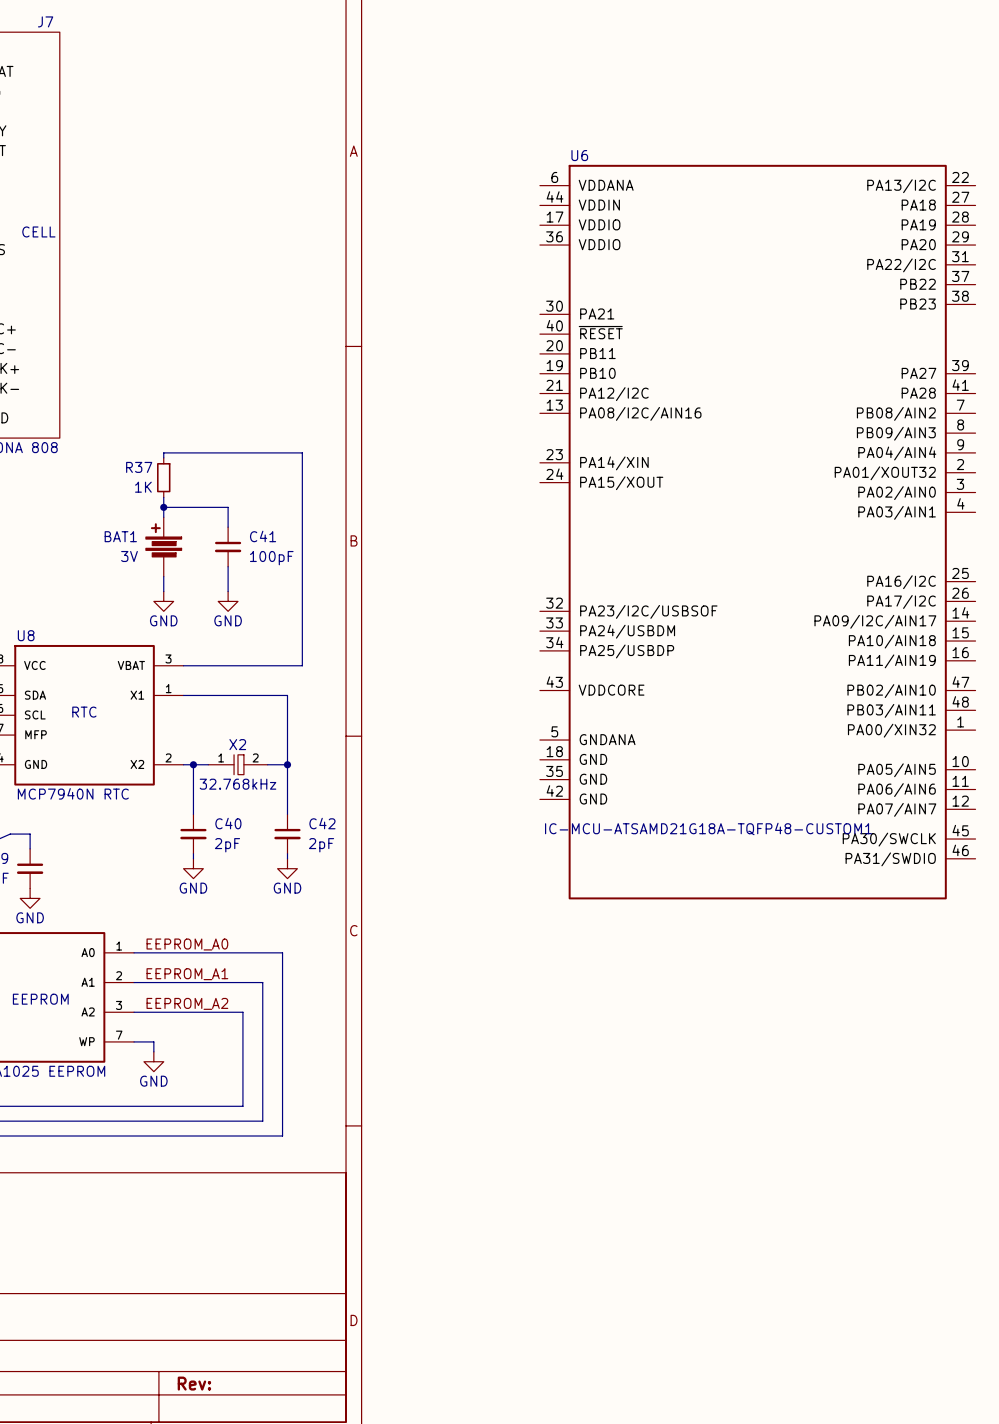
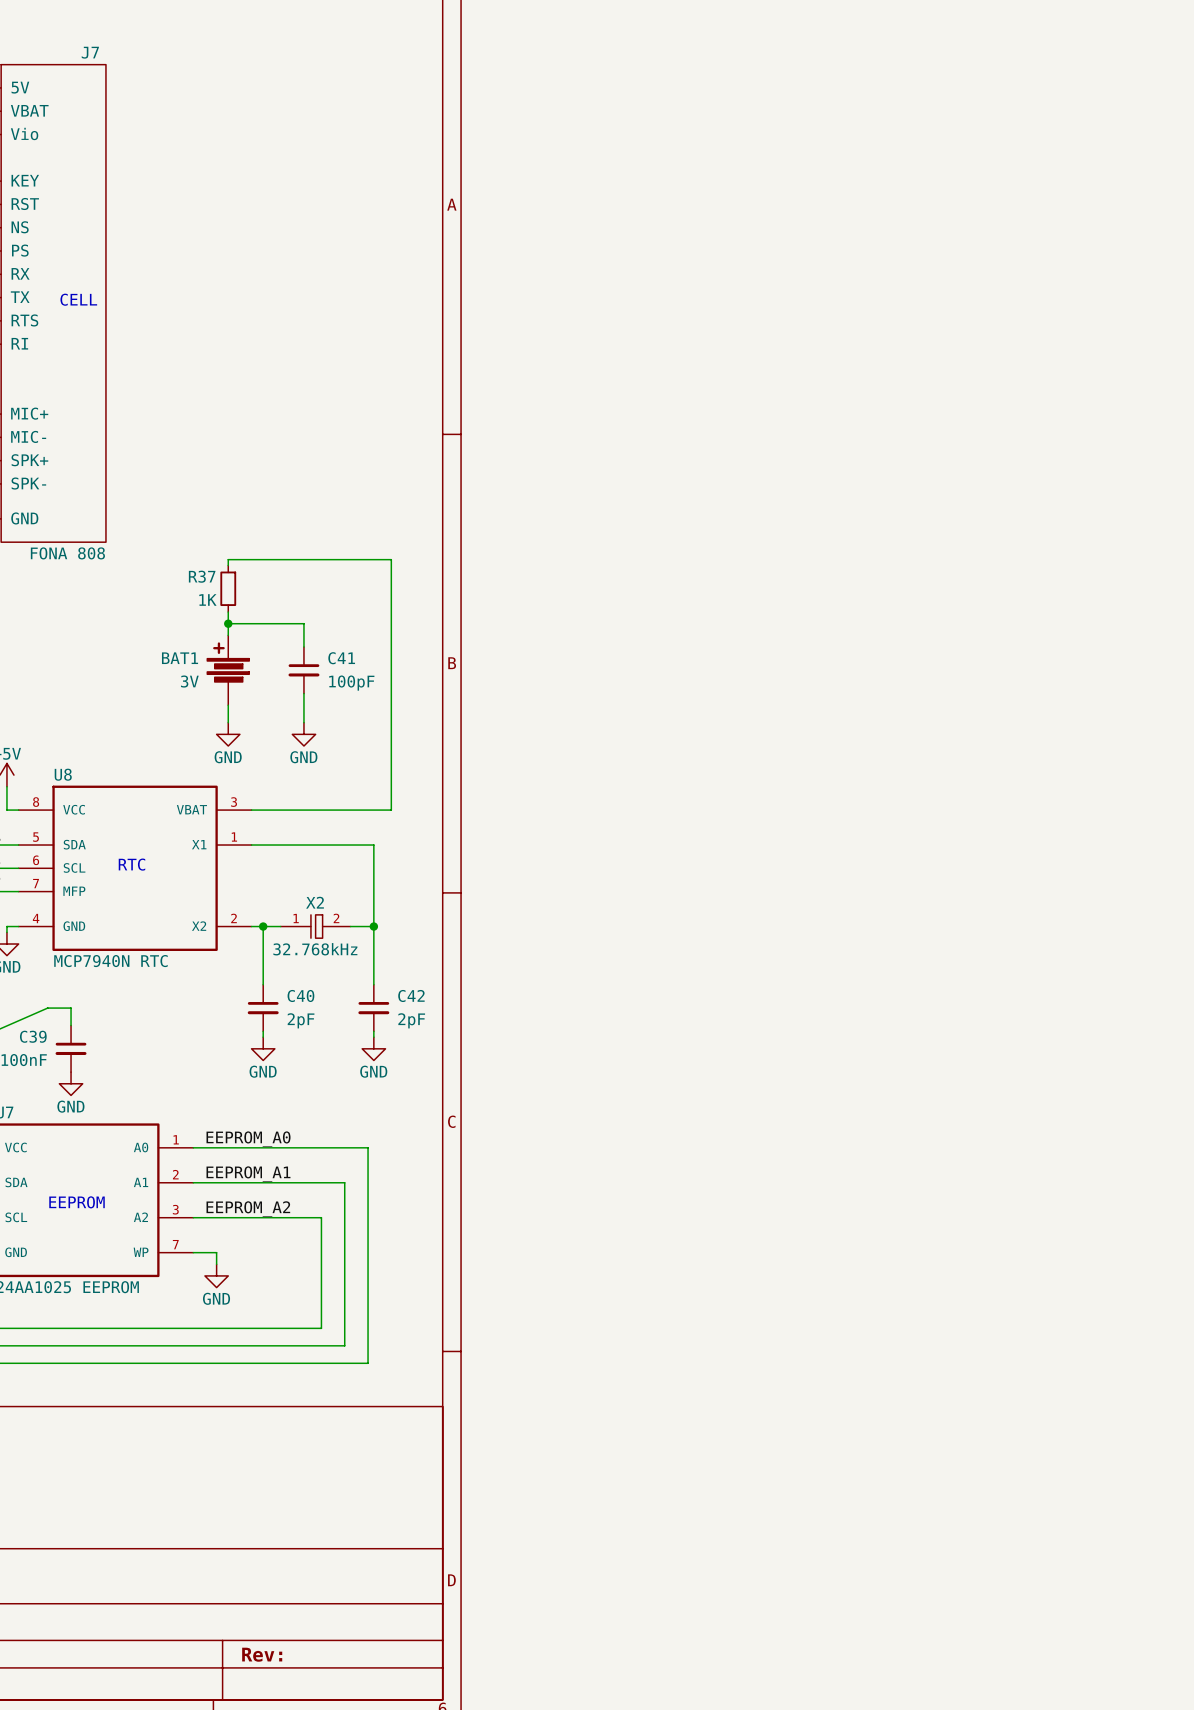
U6: IC-MCU-ATSAMD21G18A-TQFP48-CUSTOM1 (757, 532) -> none

